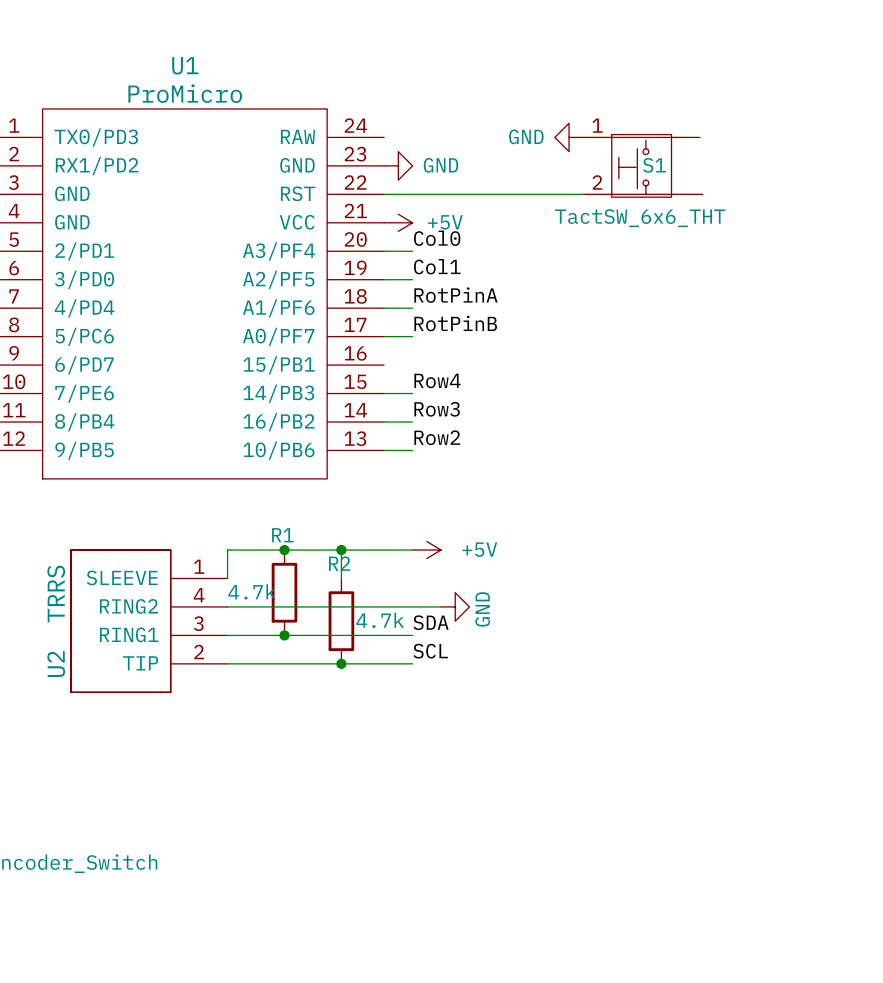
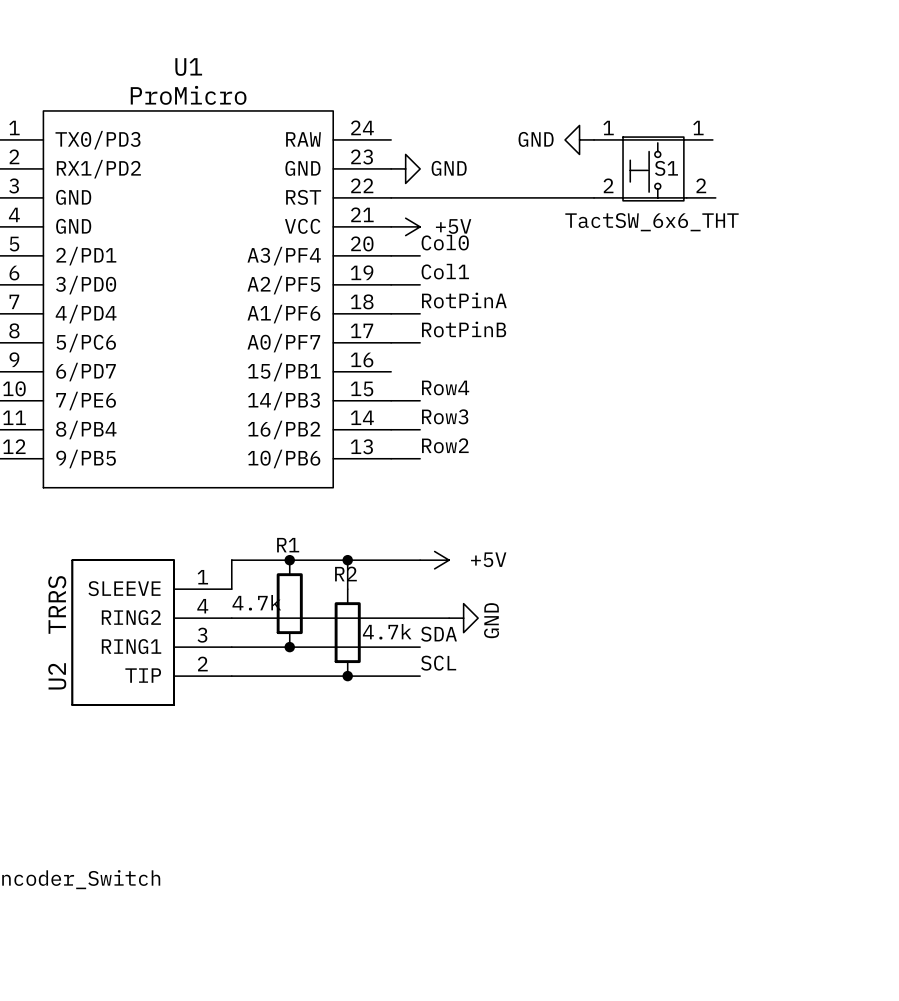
S1 pin number: none -> 1 (698, 128)
S1 pin number: none -> 2 (701, 185)

